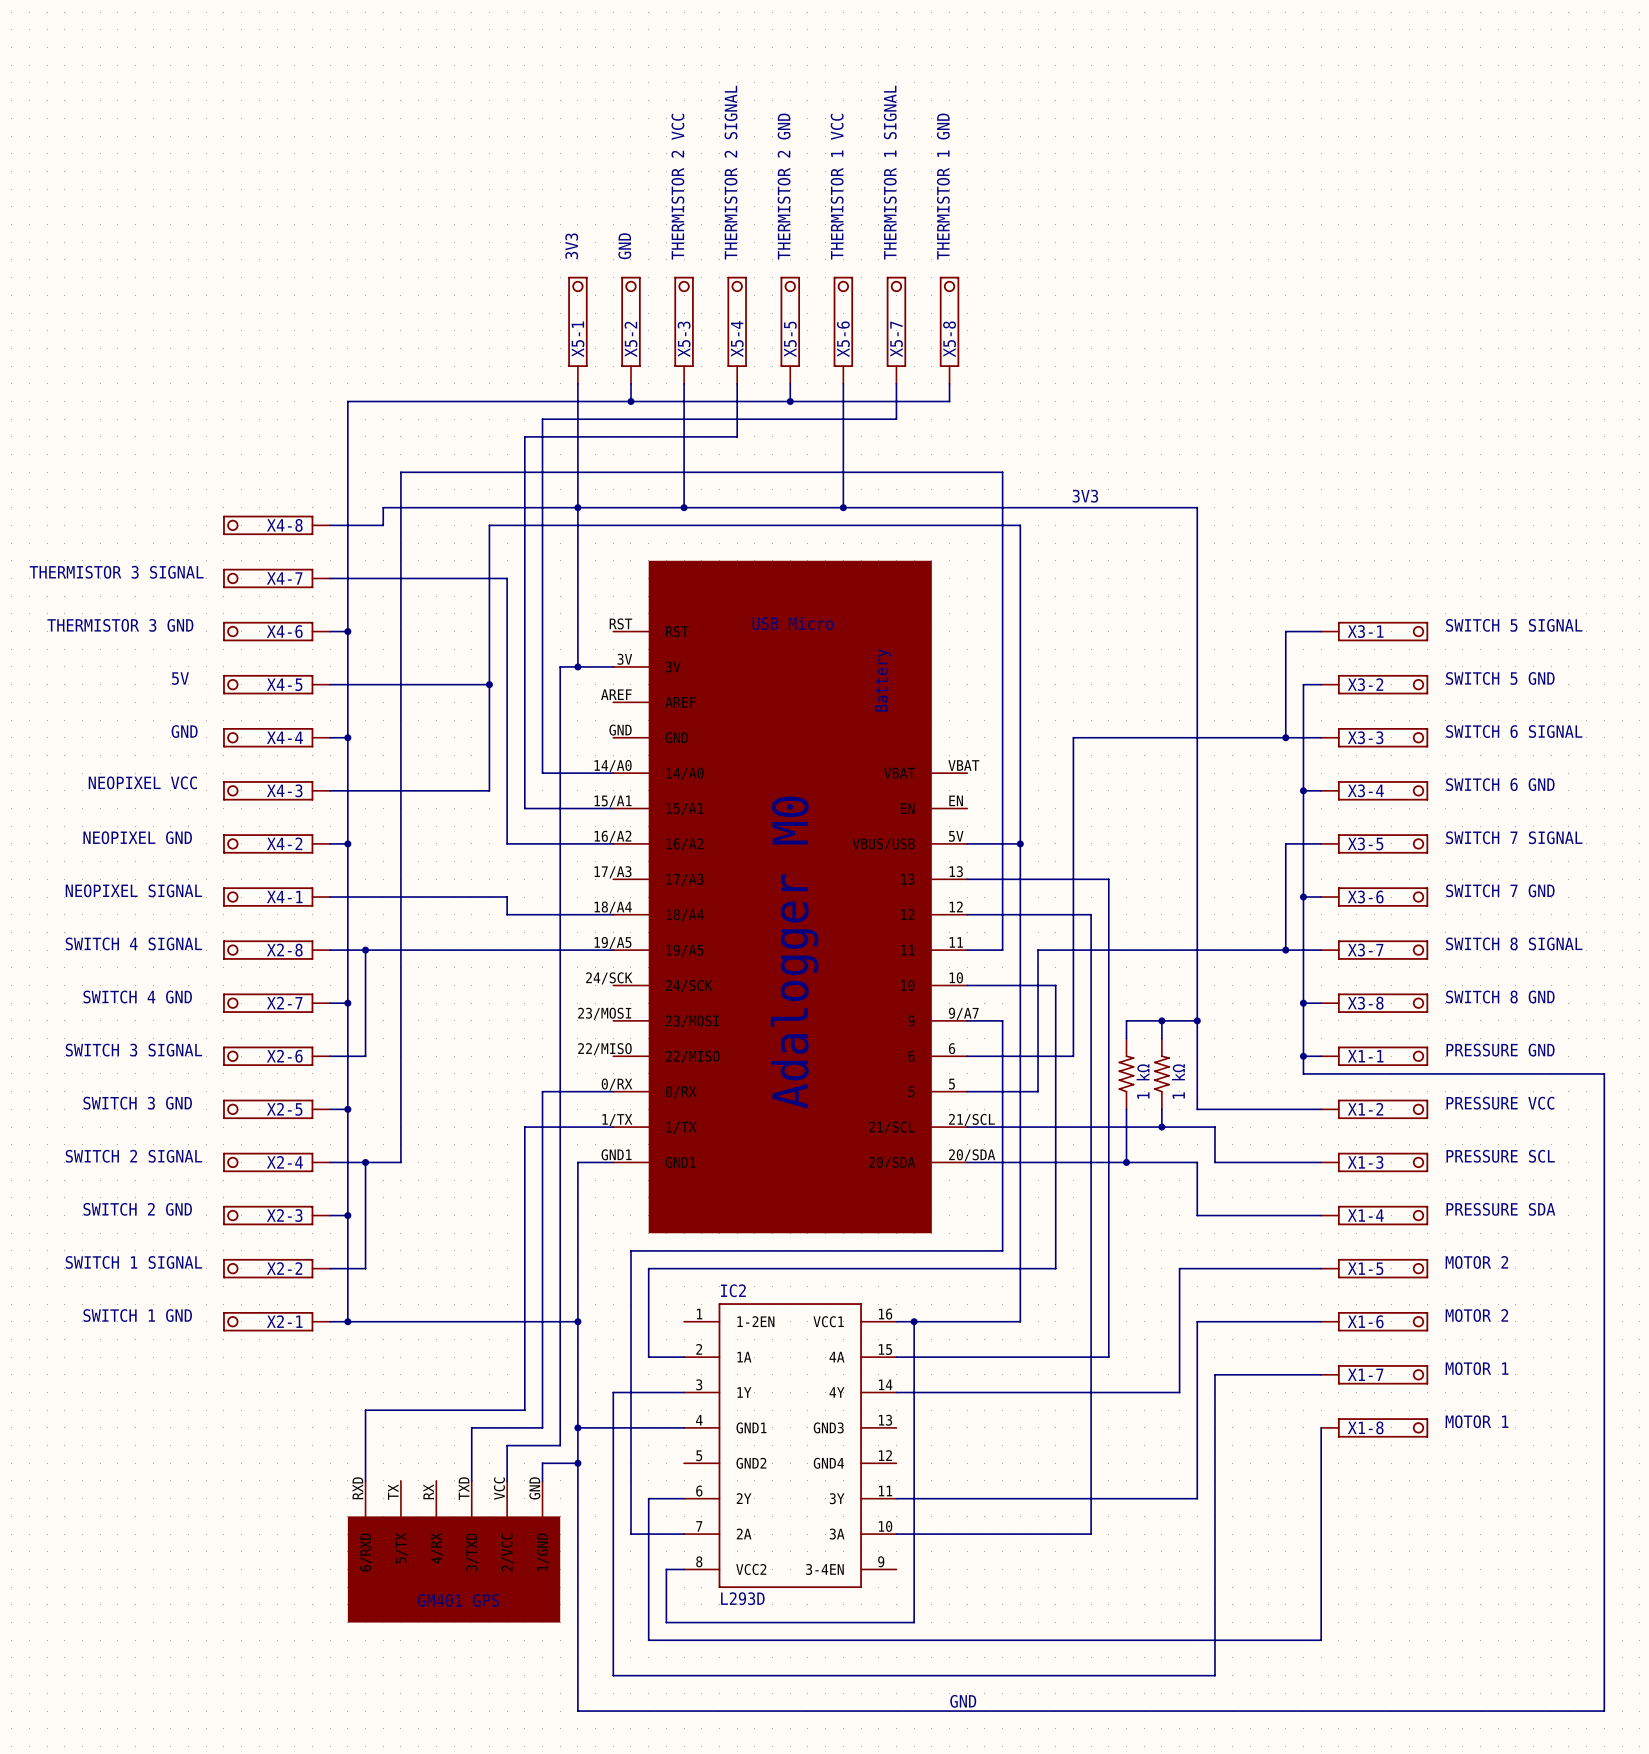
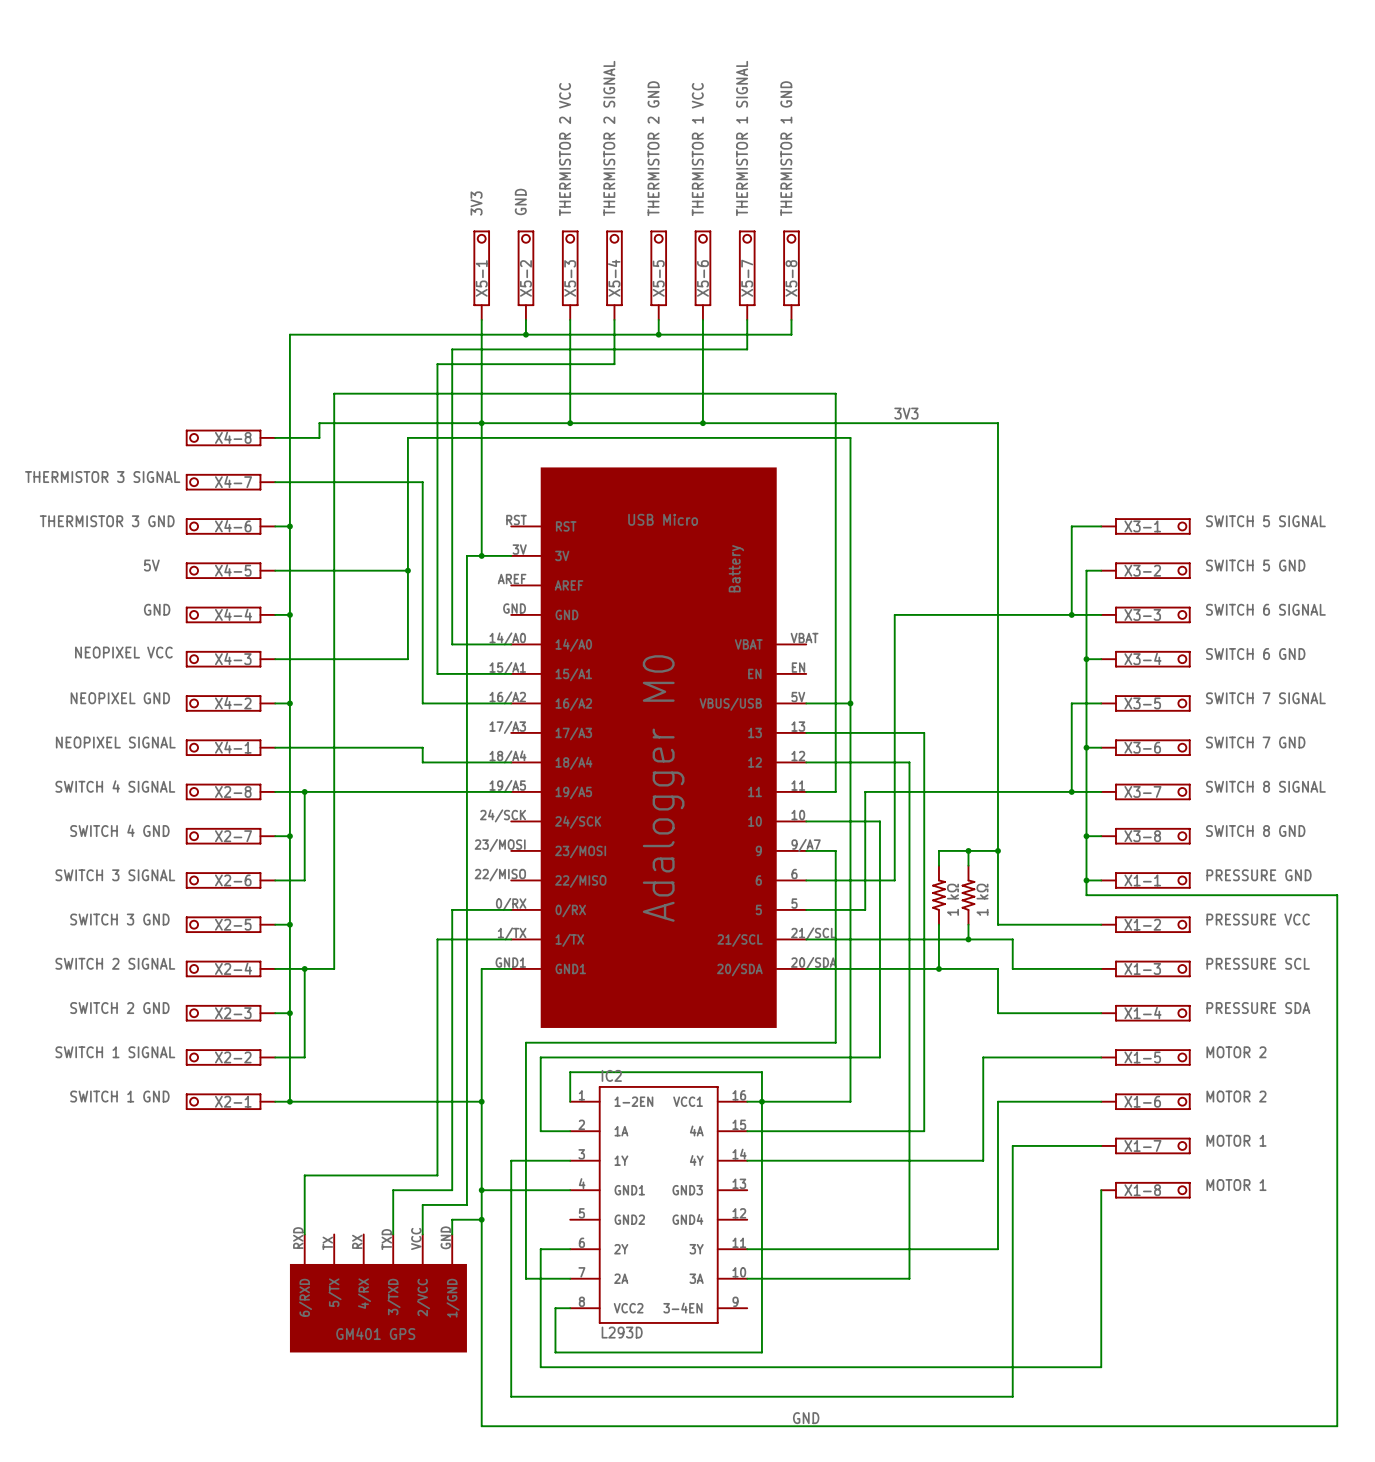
wire: none -> (570, 1101) (570, 1072) (761, 1072) (761, 1101)

